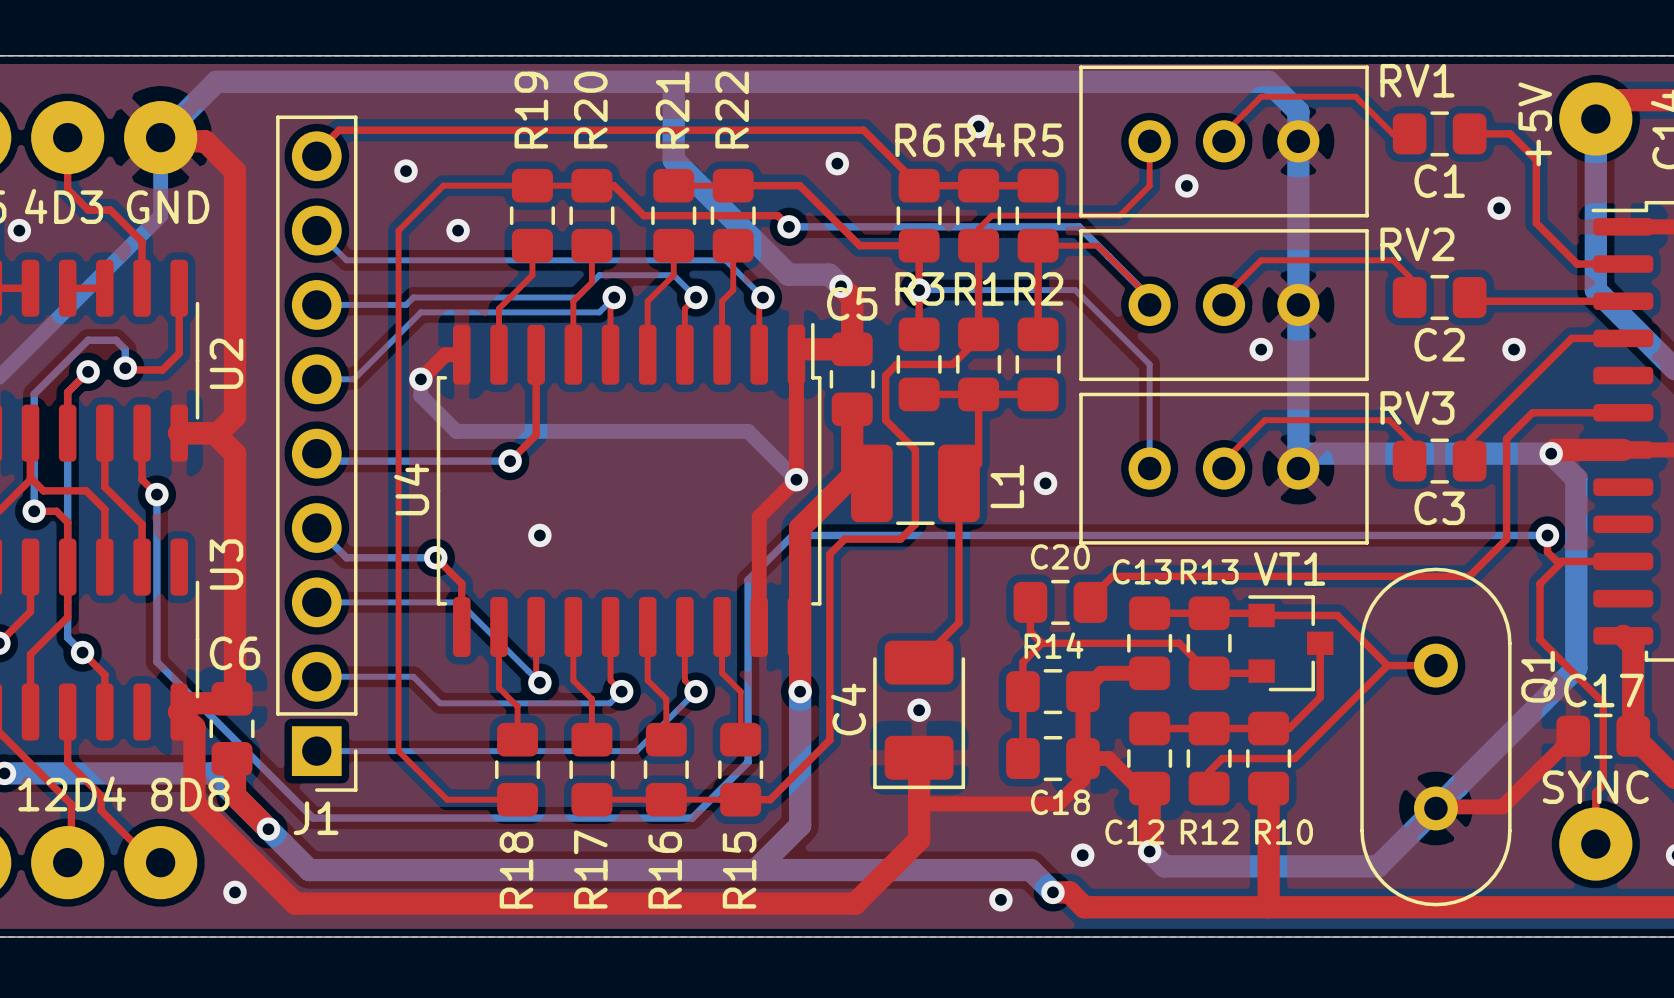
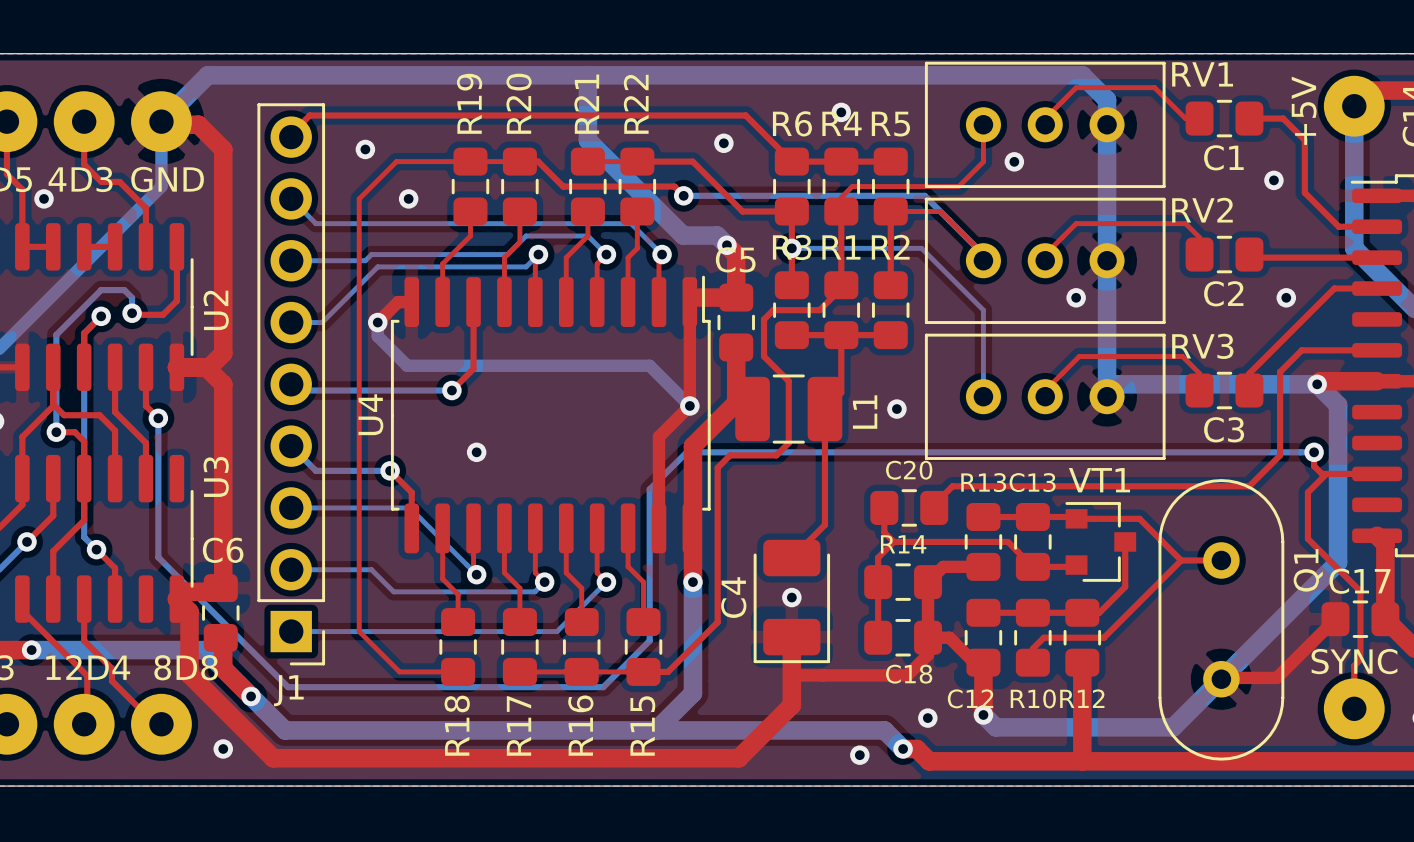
C13 name position: C13 (1142, 571) -> C13 (1032, 482)
R13 name position: R13 (1209, 571) -> R13 (983, 482)
R12 name position: R12 (1209, 832) -> R12 (1082, 698)
R10 name position: R10 (1284, 832) -> R10 (1033, 698)

